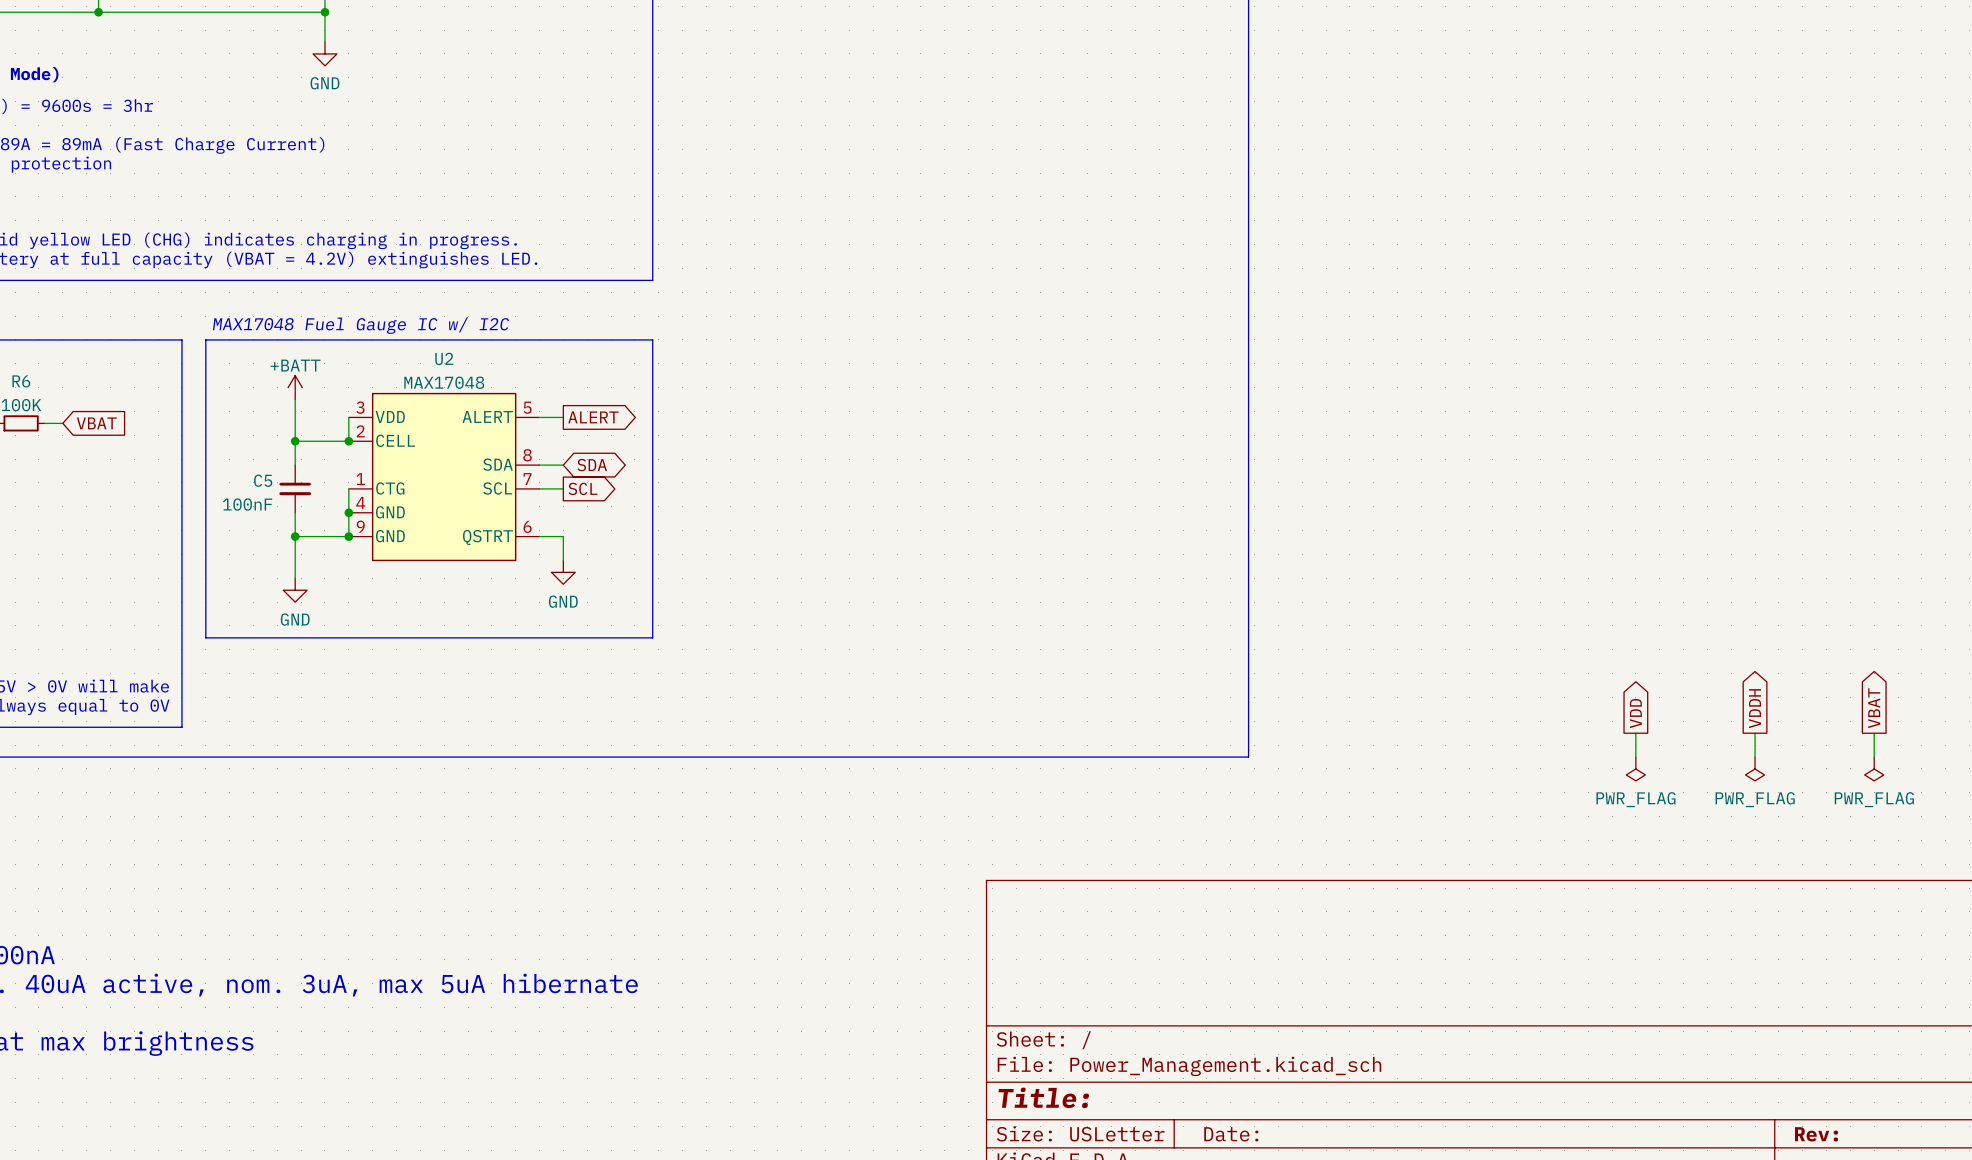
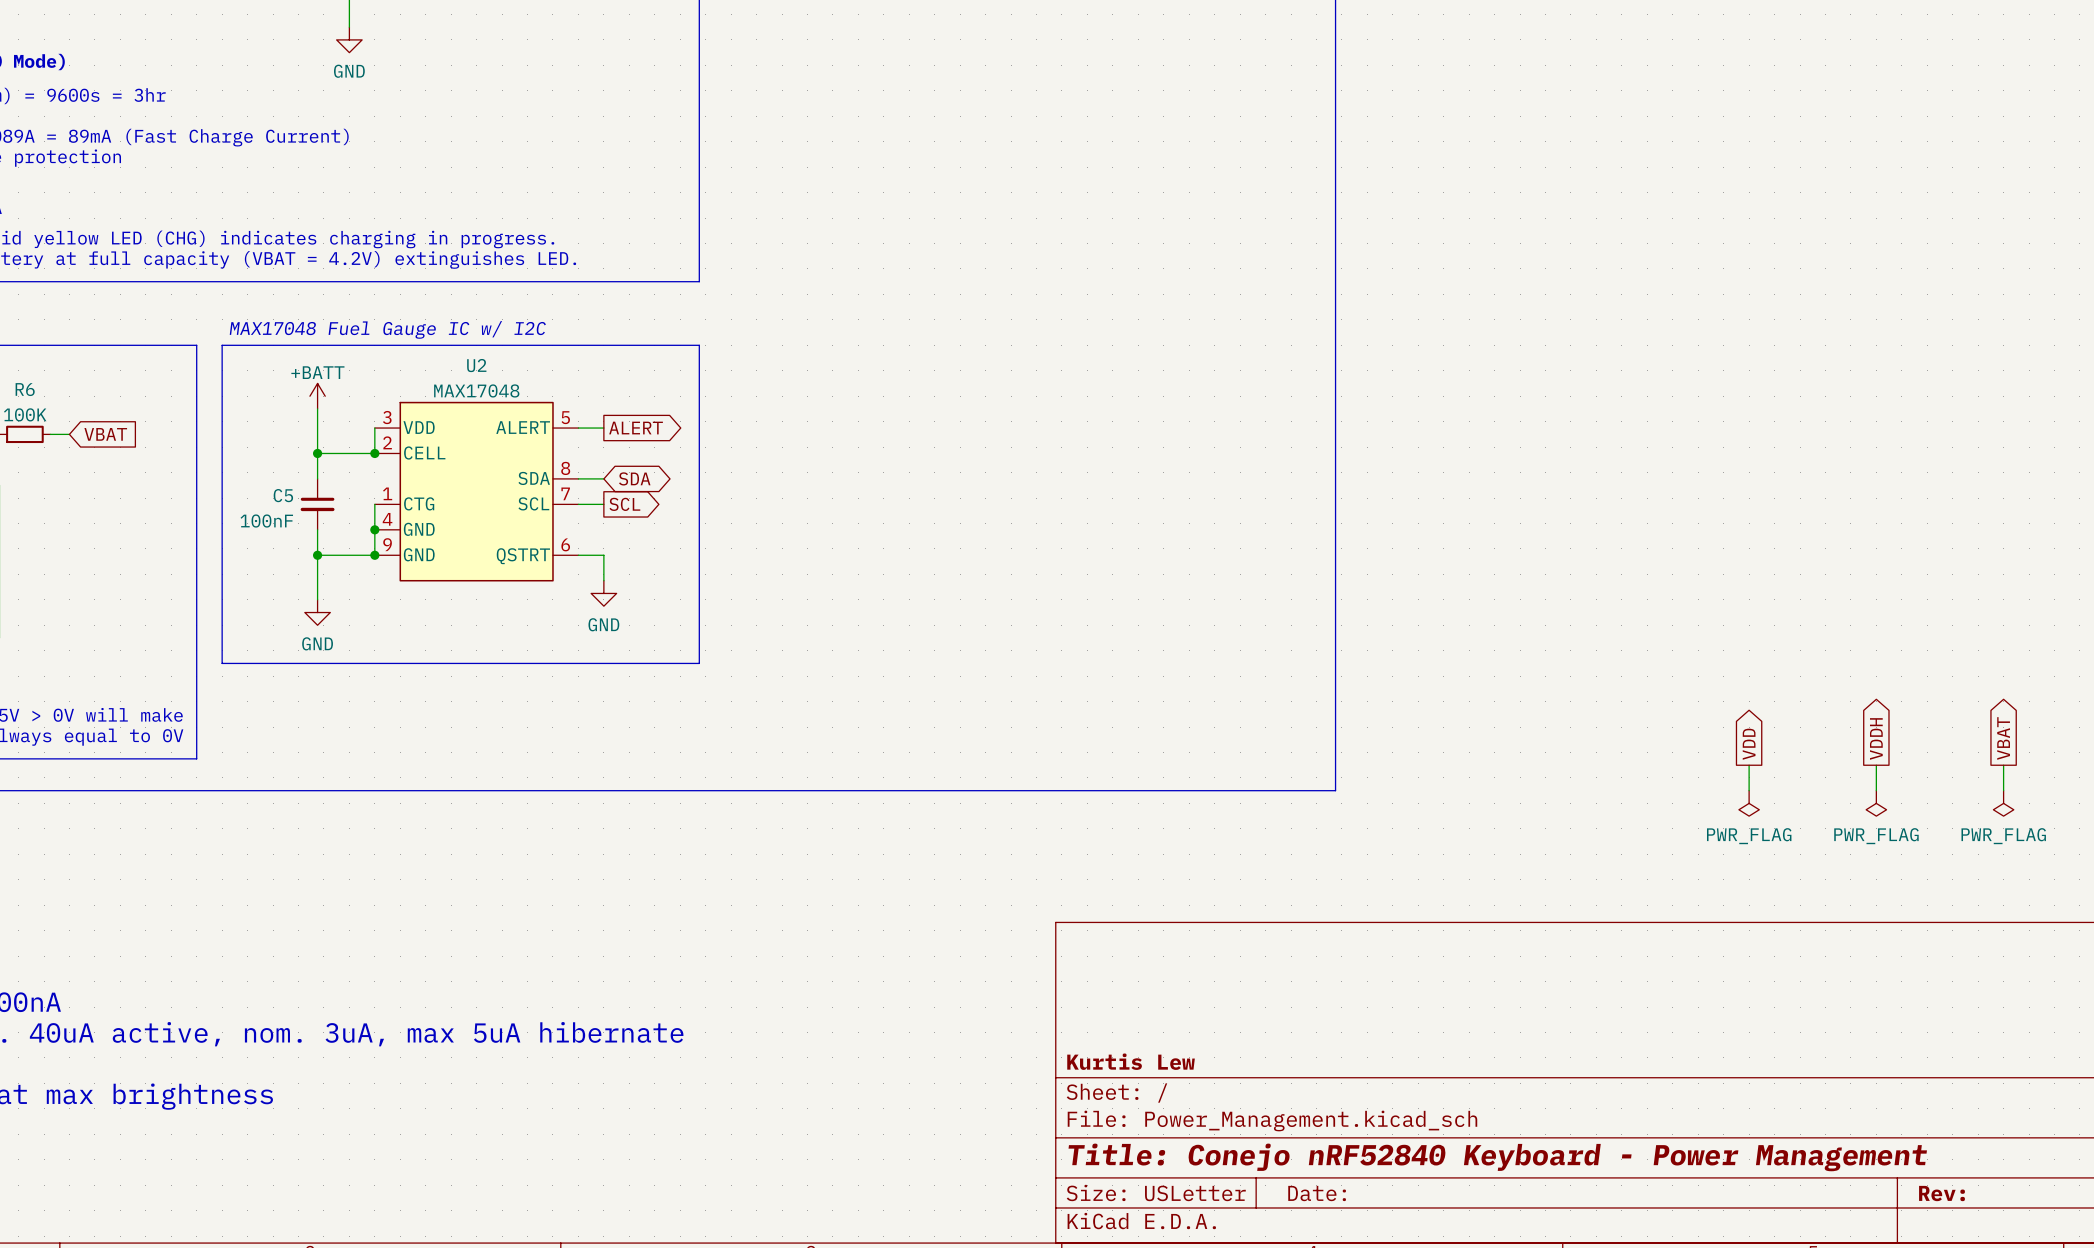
title block: none -> Kurtis Lew (1131, 1061)
title block: Title: (1043, 1097) -> Title: Conejo nRF52840 Keyboard - Power Management (1497, 1157)

